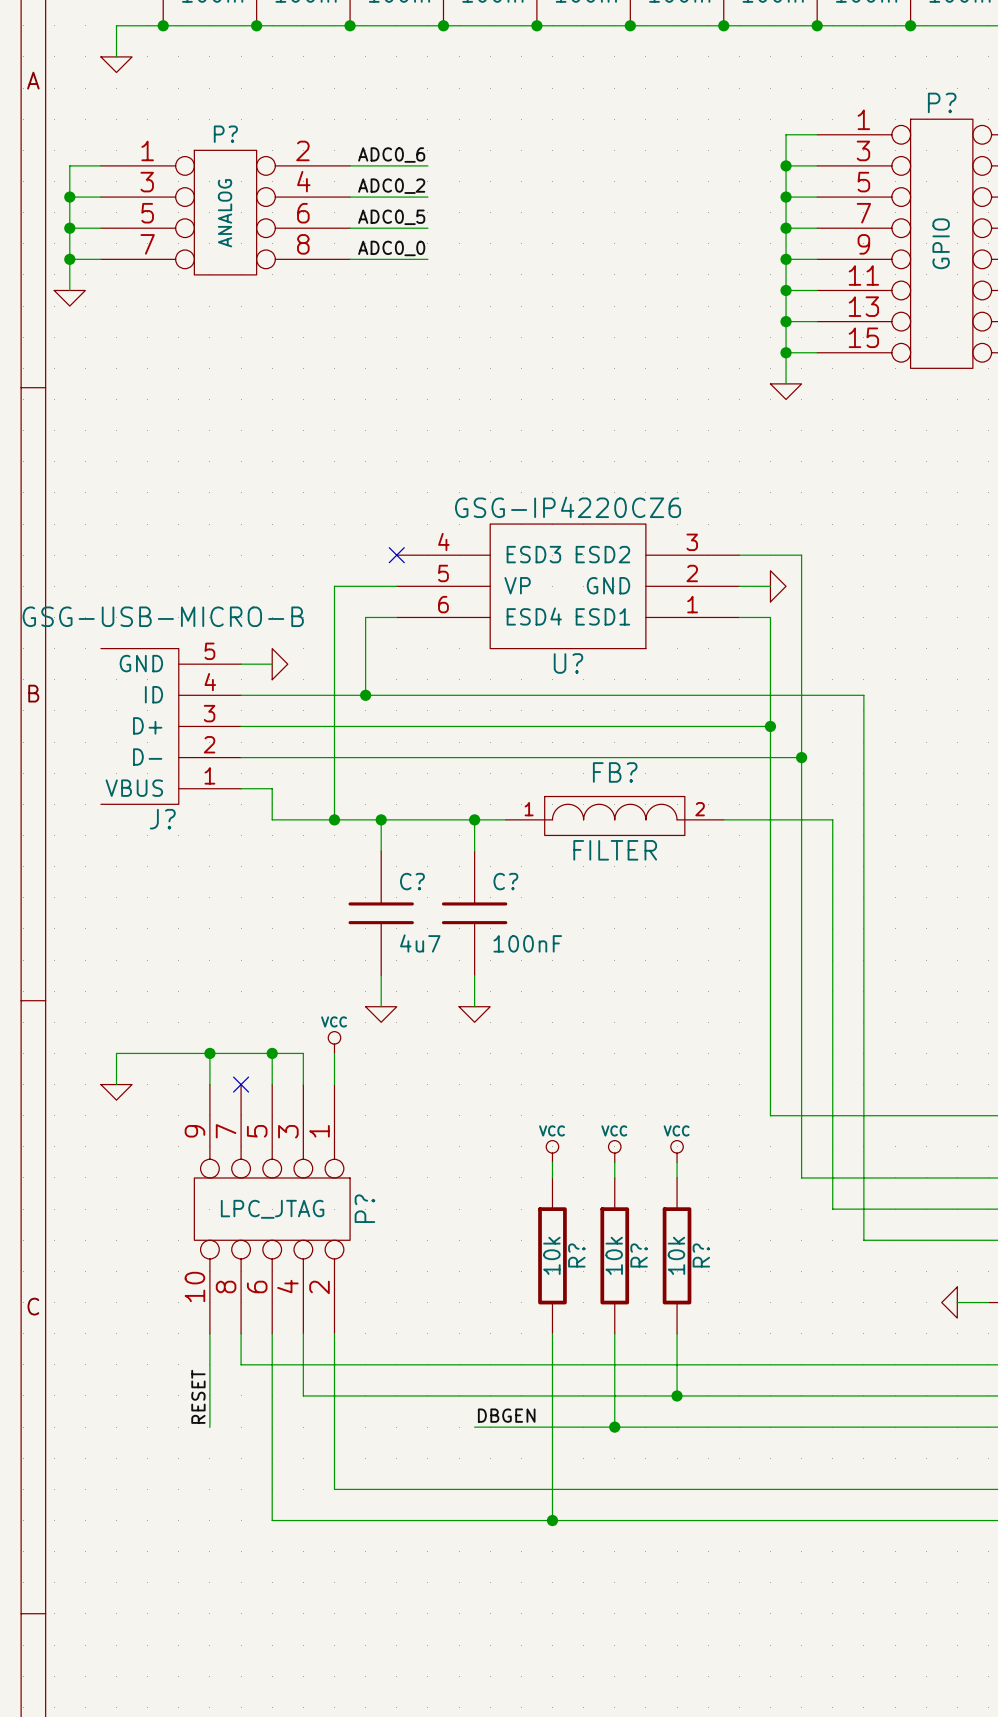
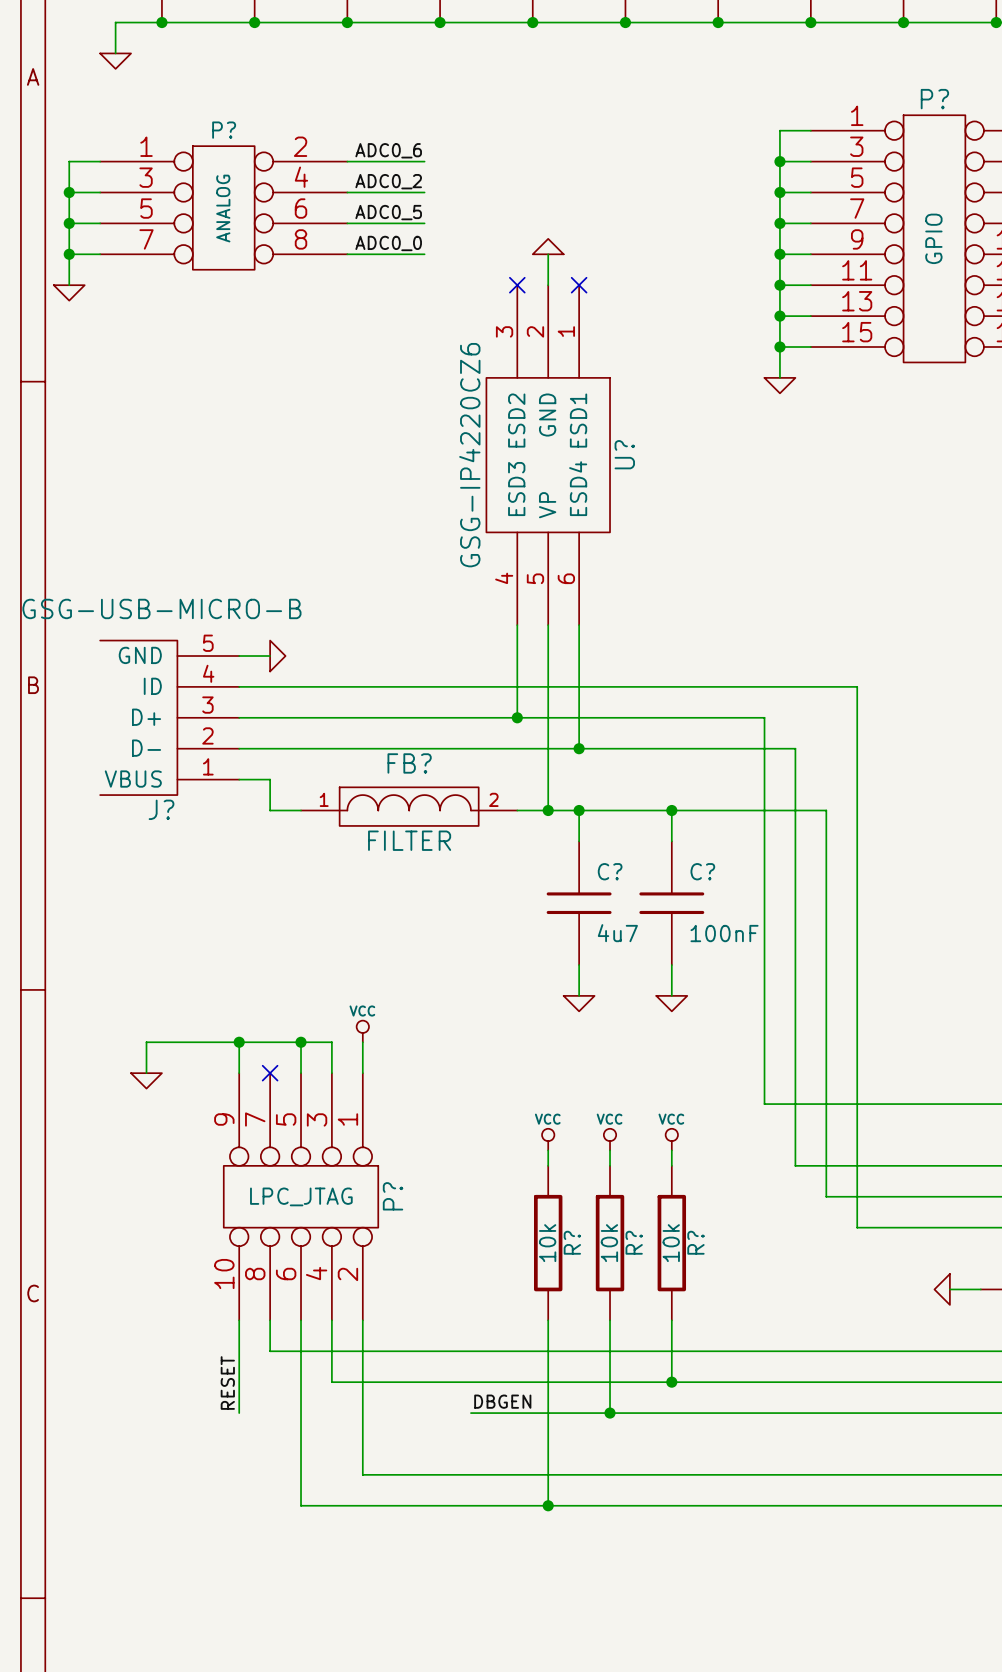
power symbol: none -> (548, 246)
wire: none -> (548, 254) (548, 285)
no-connect mark: none -> (517, 285)
no-connect mark: none -> (579, 285)
no-connect mark: (396, 555) -> none
wire: (739, 555) (801, 555) (801, 757) -> none
wire: (396, 586) (334, 586) (334, 819) -> none
U? rotation: 0° (568, 586) -> 90° counterclockwise (548, 455)
wire: (739, 586) (770, 586) -> none
power symbol: (778, 586) -> none
wire: (396, 617) (365, 617) (365, 695) -> none
wire: (739, 617) (770, 617) (770, 726) -> none
wire: none -> (517, 625) (517, 717)
wire: none -> (548, 625) (548, 810)
wire: none -> (579, 625) (579, 748)
junction: (365, 695) -> none
junction: none -> (517, 717)
junction: (770, 726) -> none
junction: none -> (579, 748)
junction: (801, 757) -> none
FB? position: (614, 815) -> (409, 806)
wire: (303, 819) (505, 819) -> (517, 810) (718, 810)
junction: (334, 819) -> none
wire: (381, 819) (381, 851) -> (579, 810) (579, 841)
junction: (381, 819) -> none
wire: (474, 819) (474, 851) -> (671, 810) (671, 841)
junction: (474, 819) -> none
junction: none -> (548, 810)
junction: none -> (579, 810)
junction: none -> (671, 810)
C? position: (381, 913) -> (579, 903)
C? position: (474, 913) -> (671, 903)
wire: (381, 975) (381, 1006) -> (579, 965) (579, 995)
wire: (474, 975) (474, 1006) -> (671, 965) (671, 995)
power symbol: (381, 1014) -> none
power symbol: (474, 1014) -> none
power symbol: none -> (579, 1003)
power symbol: none -> (671, 1003)
power symbol position: VCC (334, 1042) -> VCC (362, 1031)
wire: (147, 1053) (116, 1053) (116, 1084) -> (146, 1042) (146, 1073)
wire: (209, 1053) (209, 1084) -> (362, 1042) (362, 1073)
junction: (209, 1053) -> none
junction: none -> (239, 1042)
wire: (272, 1053) (272, 1084) -> (239, 1042) (239, 1073)
junction: (272, 1053) -> none
wire: none -> (301, 1042) (331, 1042)
junction: none -> (301, 1042)
no-connect mark position: (241, 1084) -> (270, 1073)
power symbol position: (116, 1092) -> (146, 1080)
P? position: (272, 1209) -> (301, 1196)
wire: (209, 1333) (209, 1427) -> none
wire: none -> (362, 1320) (362, 1474)
wire: (241, 1364) (272, 1364) (272, 1520) (303, 1520) -> (239, 1351) (239, 1413)
wire: (303, 1395) (334, 1395) (334, 1489) (365, 1489) -> (301, 1382) (301, 1505)
label position: RESET (198, 1396) -> RESET (227, 1383)

